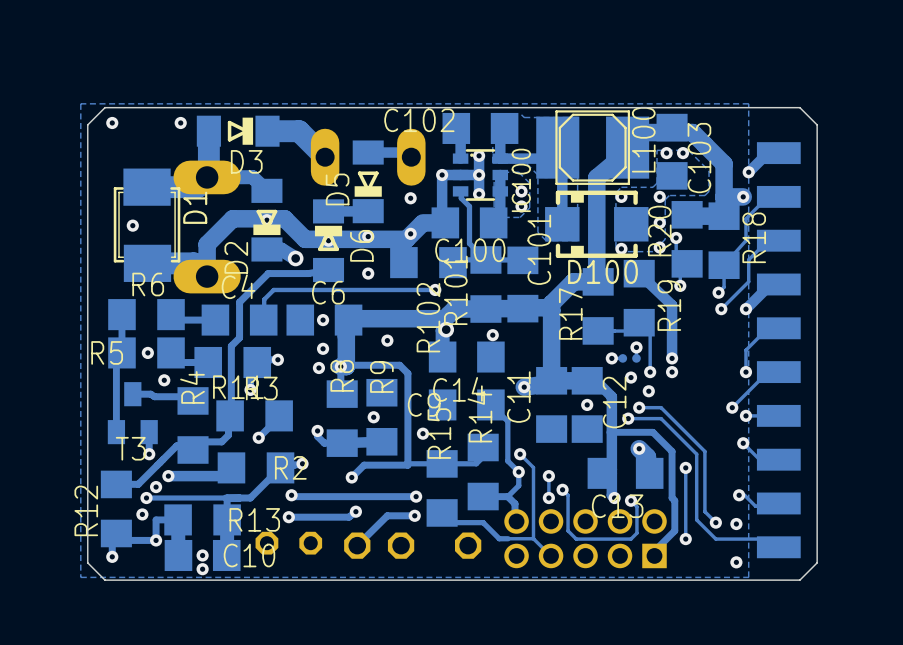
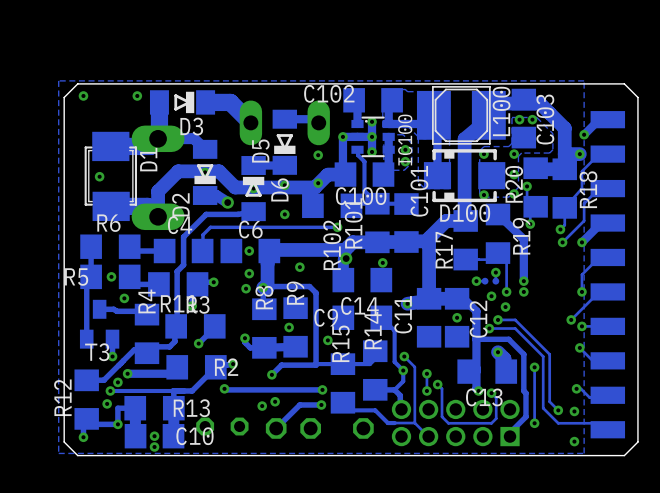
track: (357, 511) (349, 517) (288, 517) -> none
via position: (288, 517) -> (262, 406)

